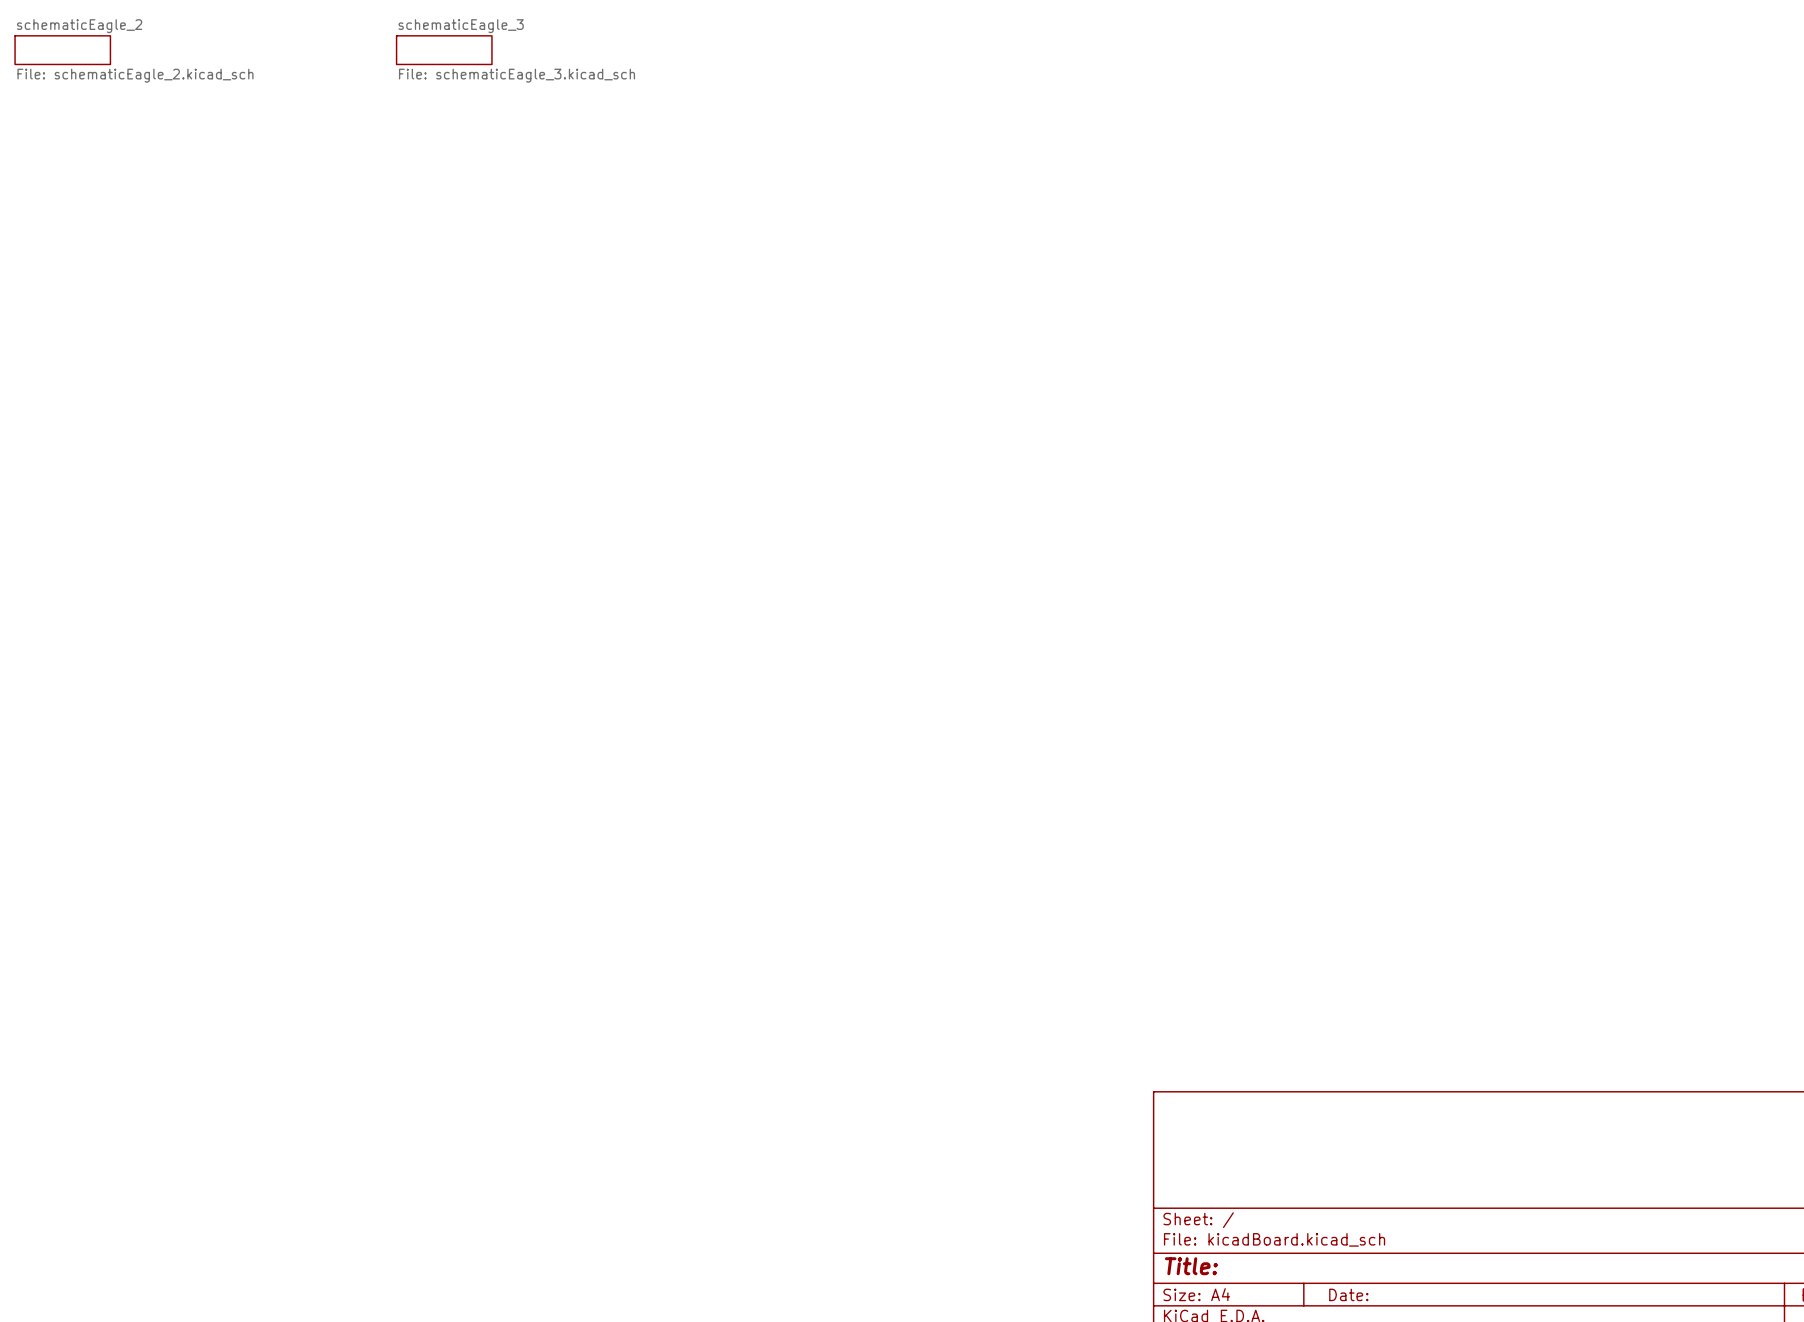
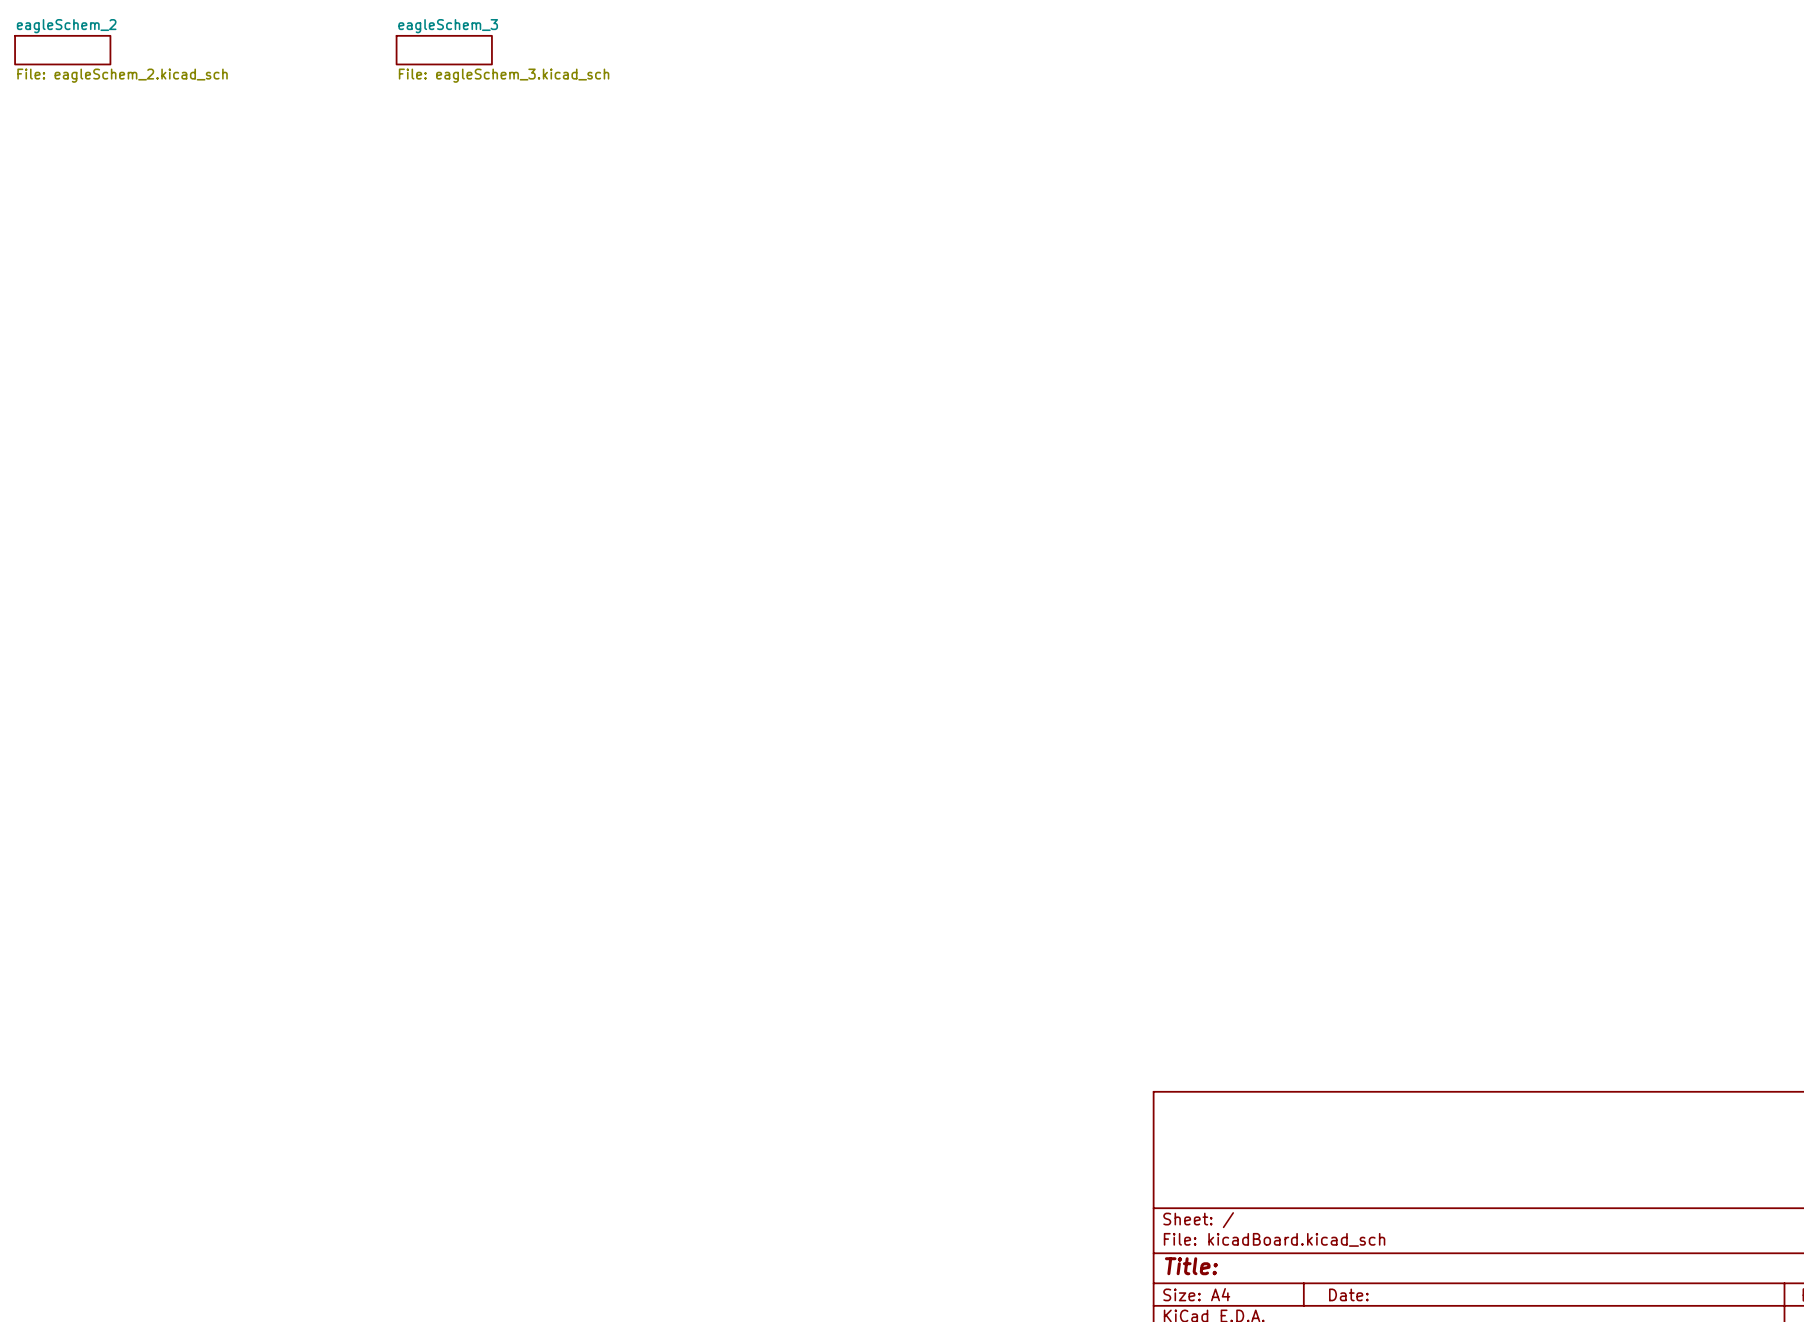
sheet schematicEagle_2 name: schematicEagle_2 (79, 26) -> eagleSchem_2 (66, 26)
sheet schematicEagle_3 name: schematicEagle_3 (461, 26) -> eagleSchem_3 (448, 26)
sheet schematicEagle_2 value: File: schematicEagle_2.kicad_sch (135, 75) -> File: eagleSchem_2.kicad_sch (122, 75)
sheet schematicEagle_3 value: File: schematicEagle_3.kicad_sch (517, 75) -> File: eagleSchem_3.kicad_sch (504, 75)

